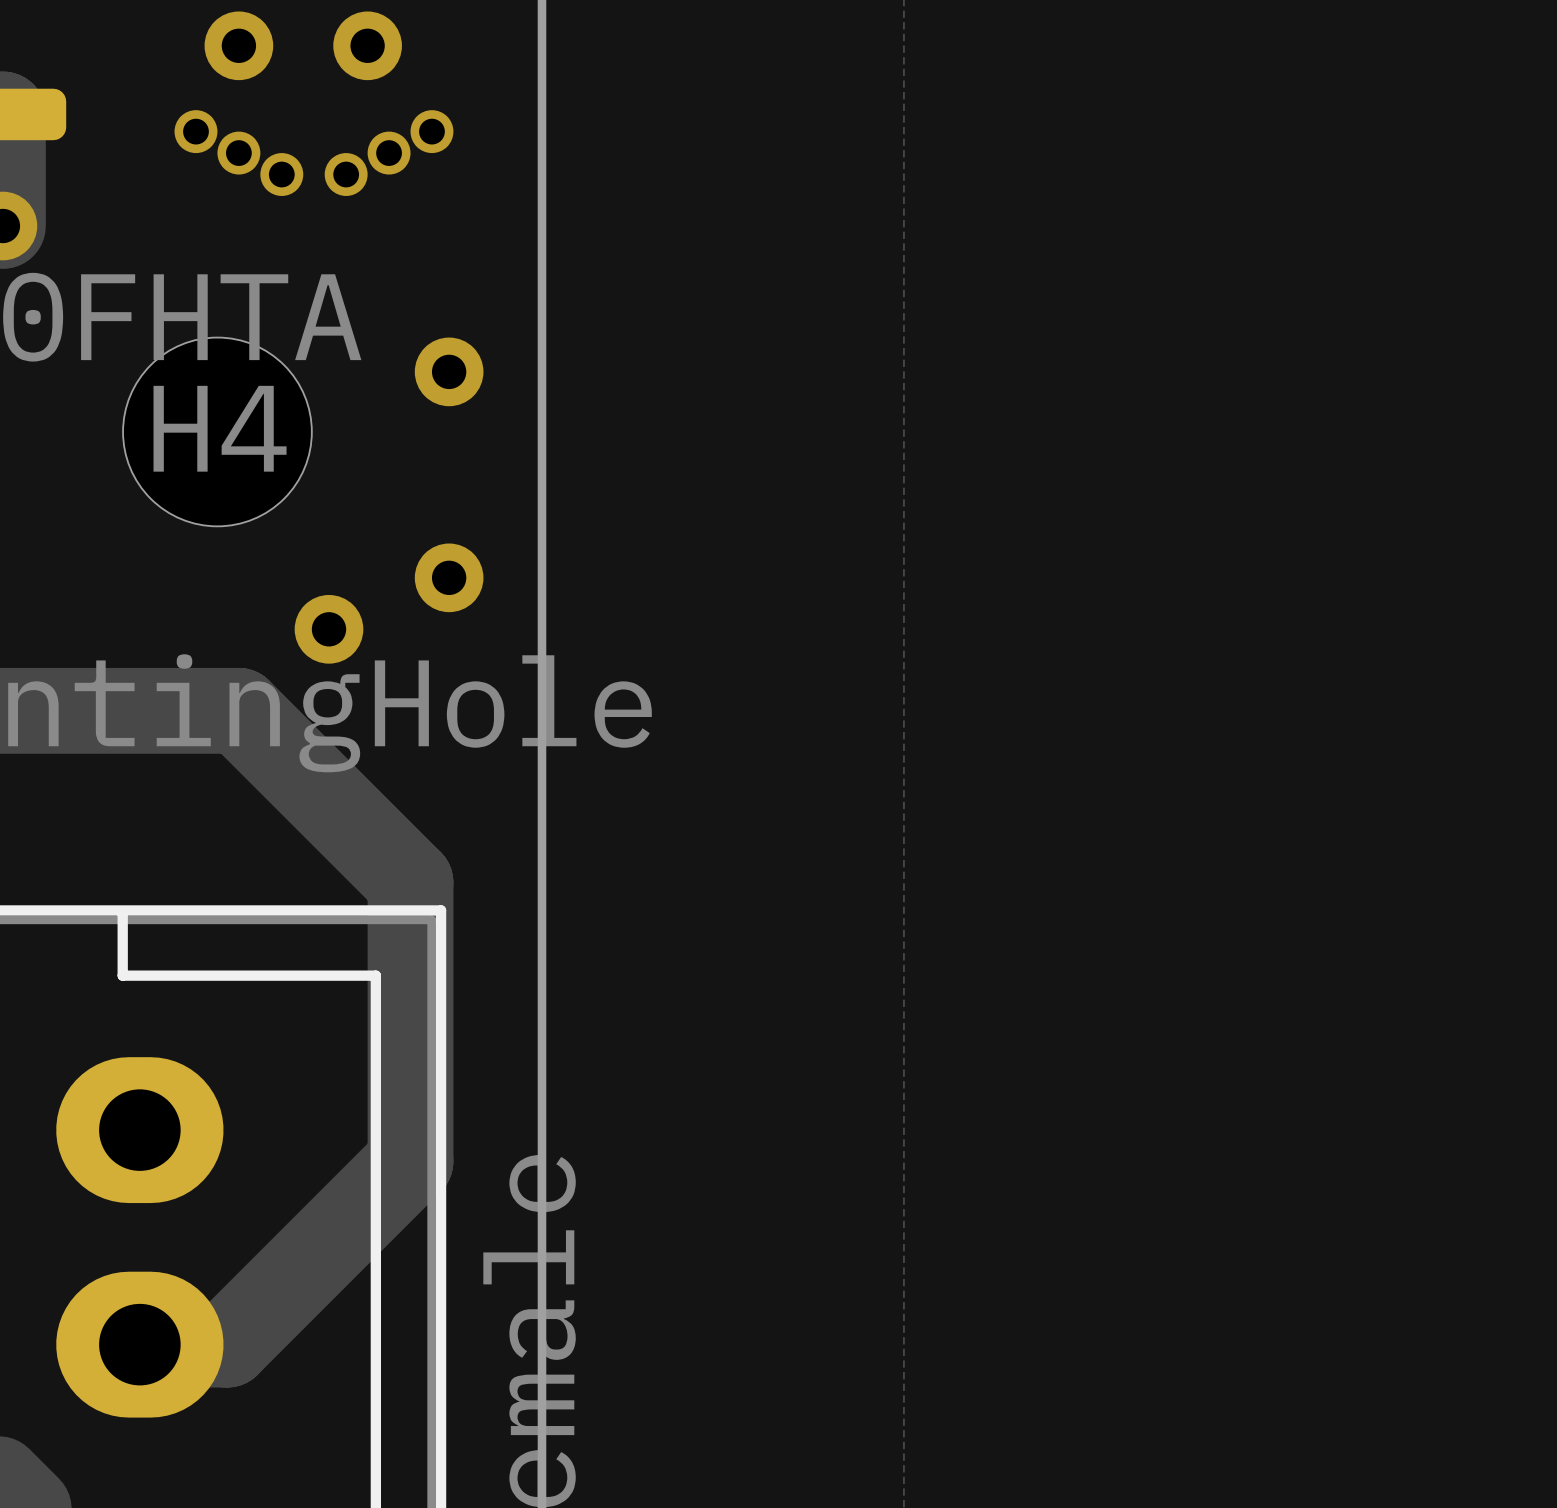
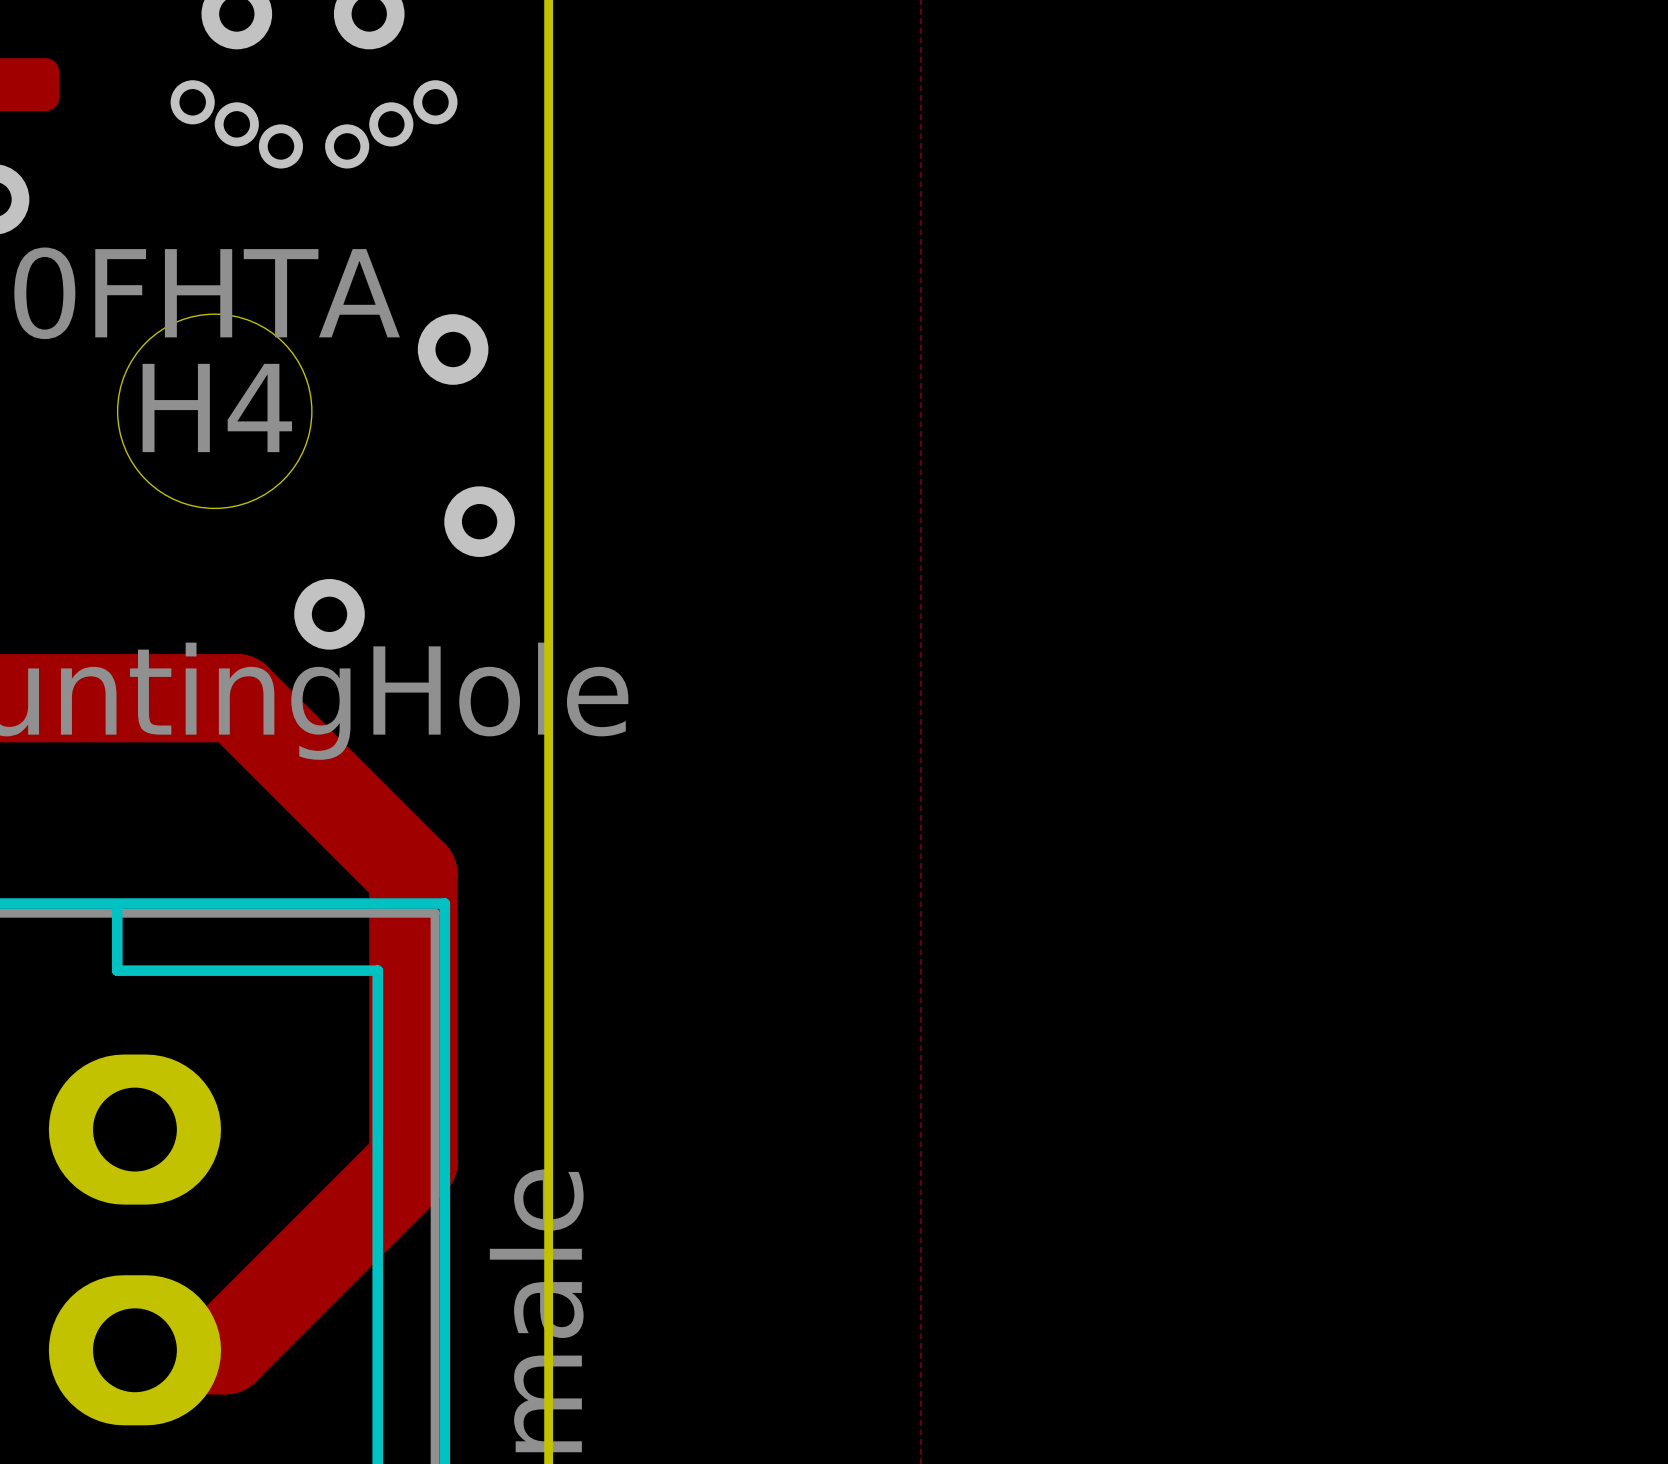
via position: (449, 577) -> (479, 521)

